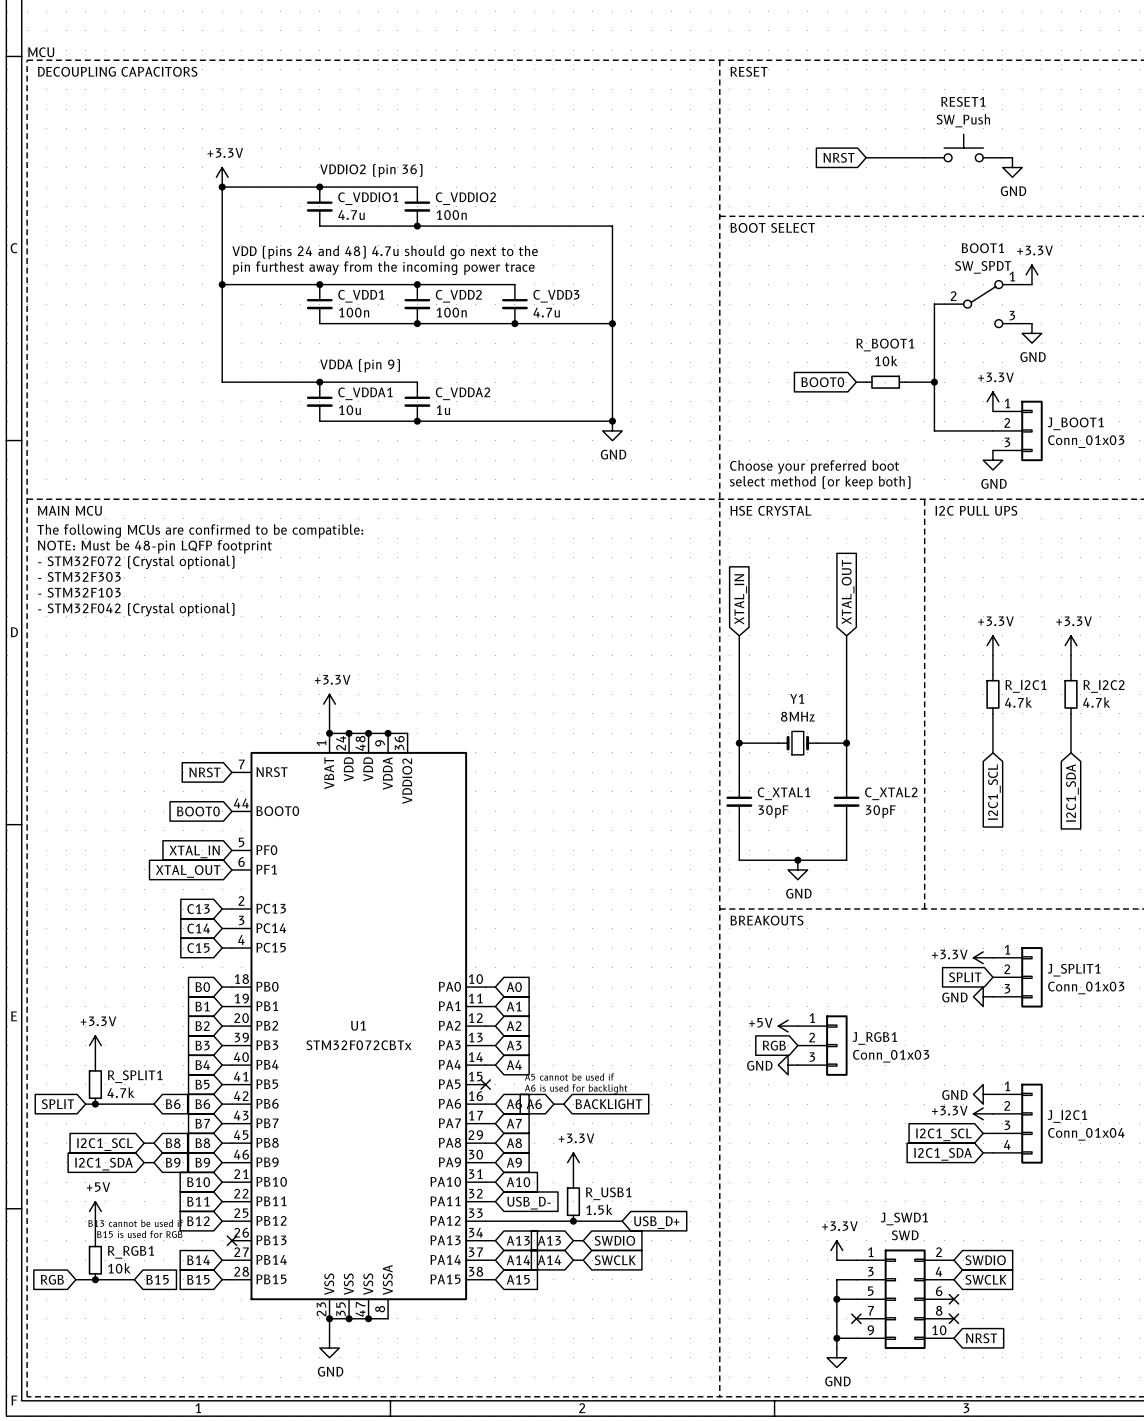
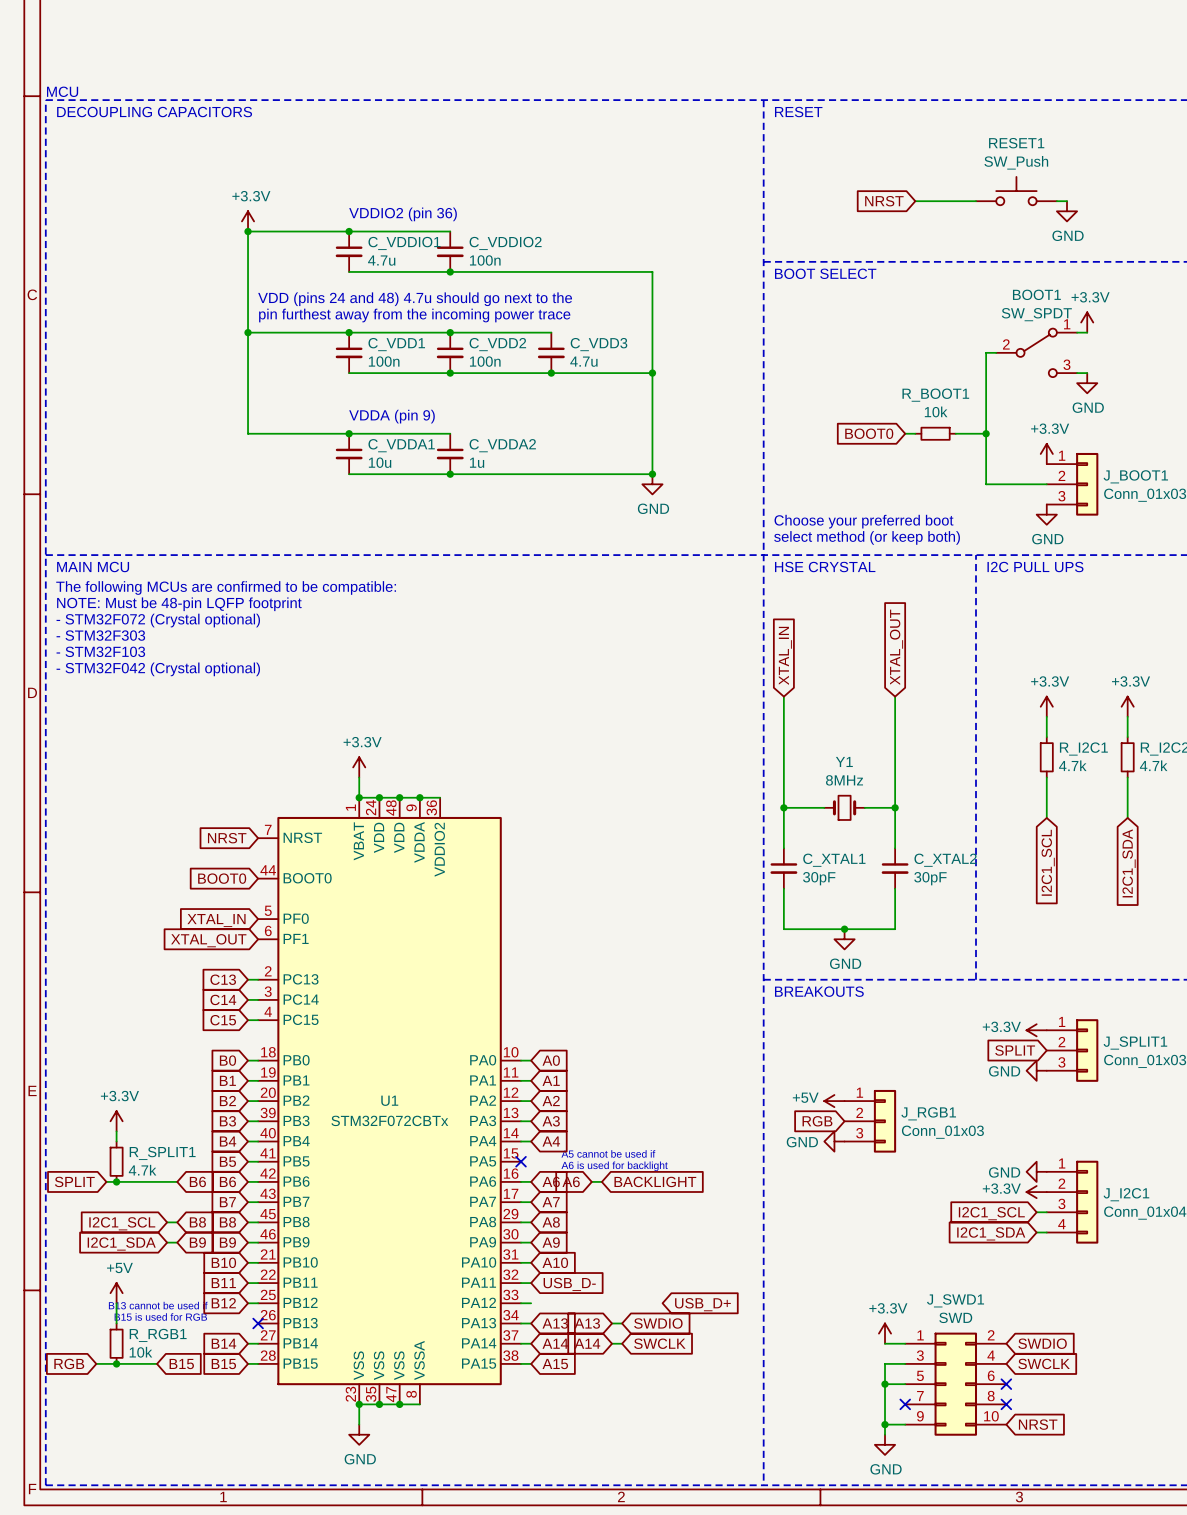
power symbol: +3.3V (573, 1162) -> none
wire: (573, 1172) (573, 1182) -> none
R_USB1: 1.5k (573, 1201) -> none
wire: (495, 1221) (622, 1221) -> none
junction: (573, 1221) -> none

